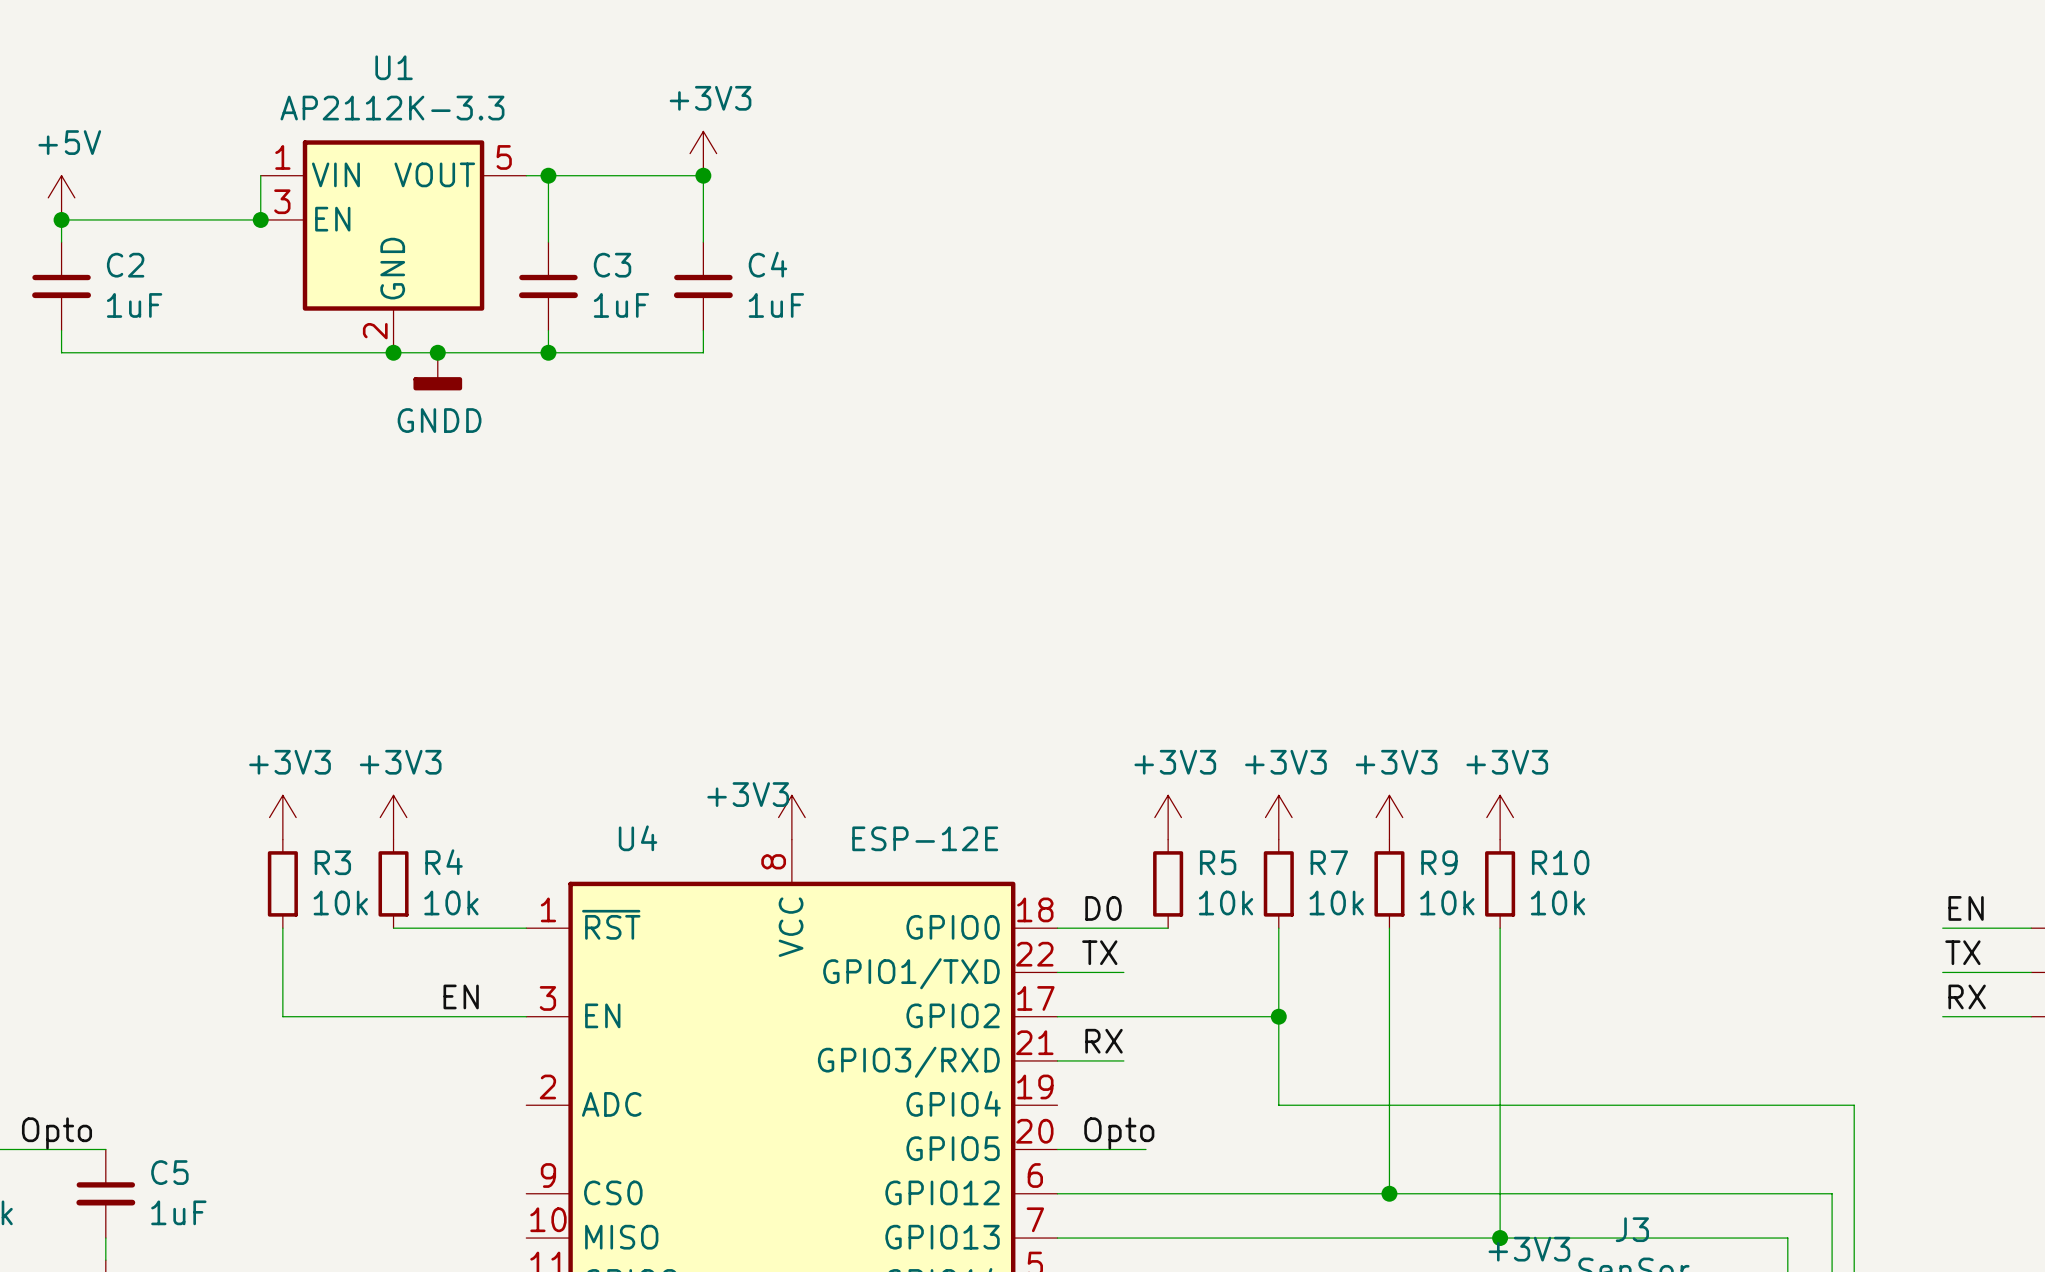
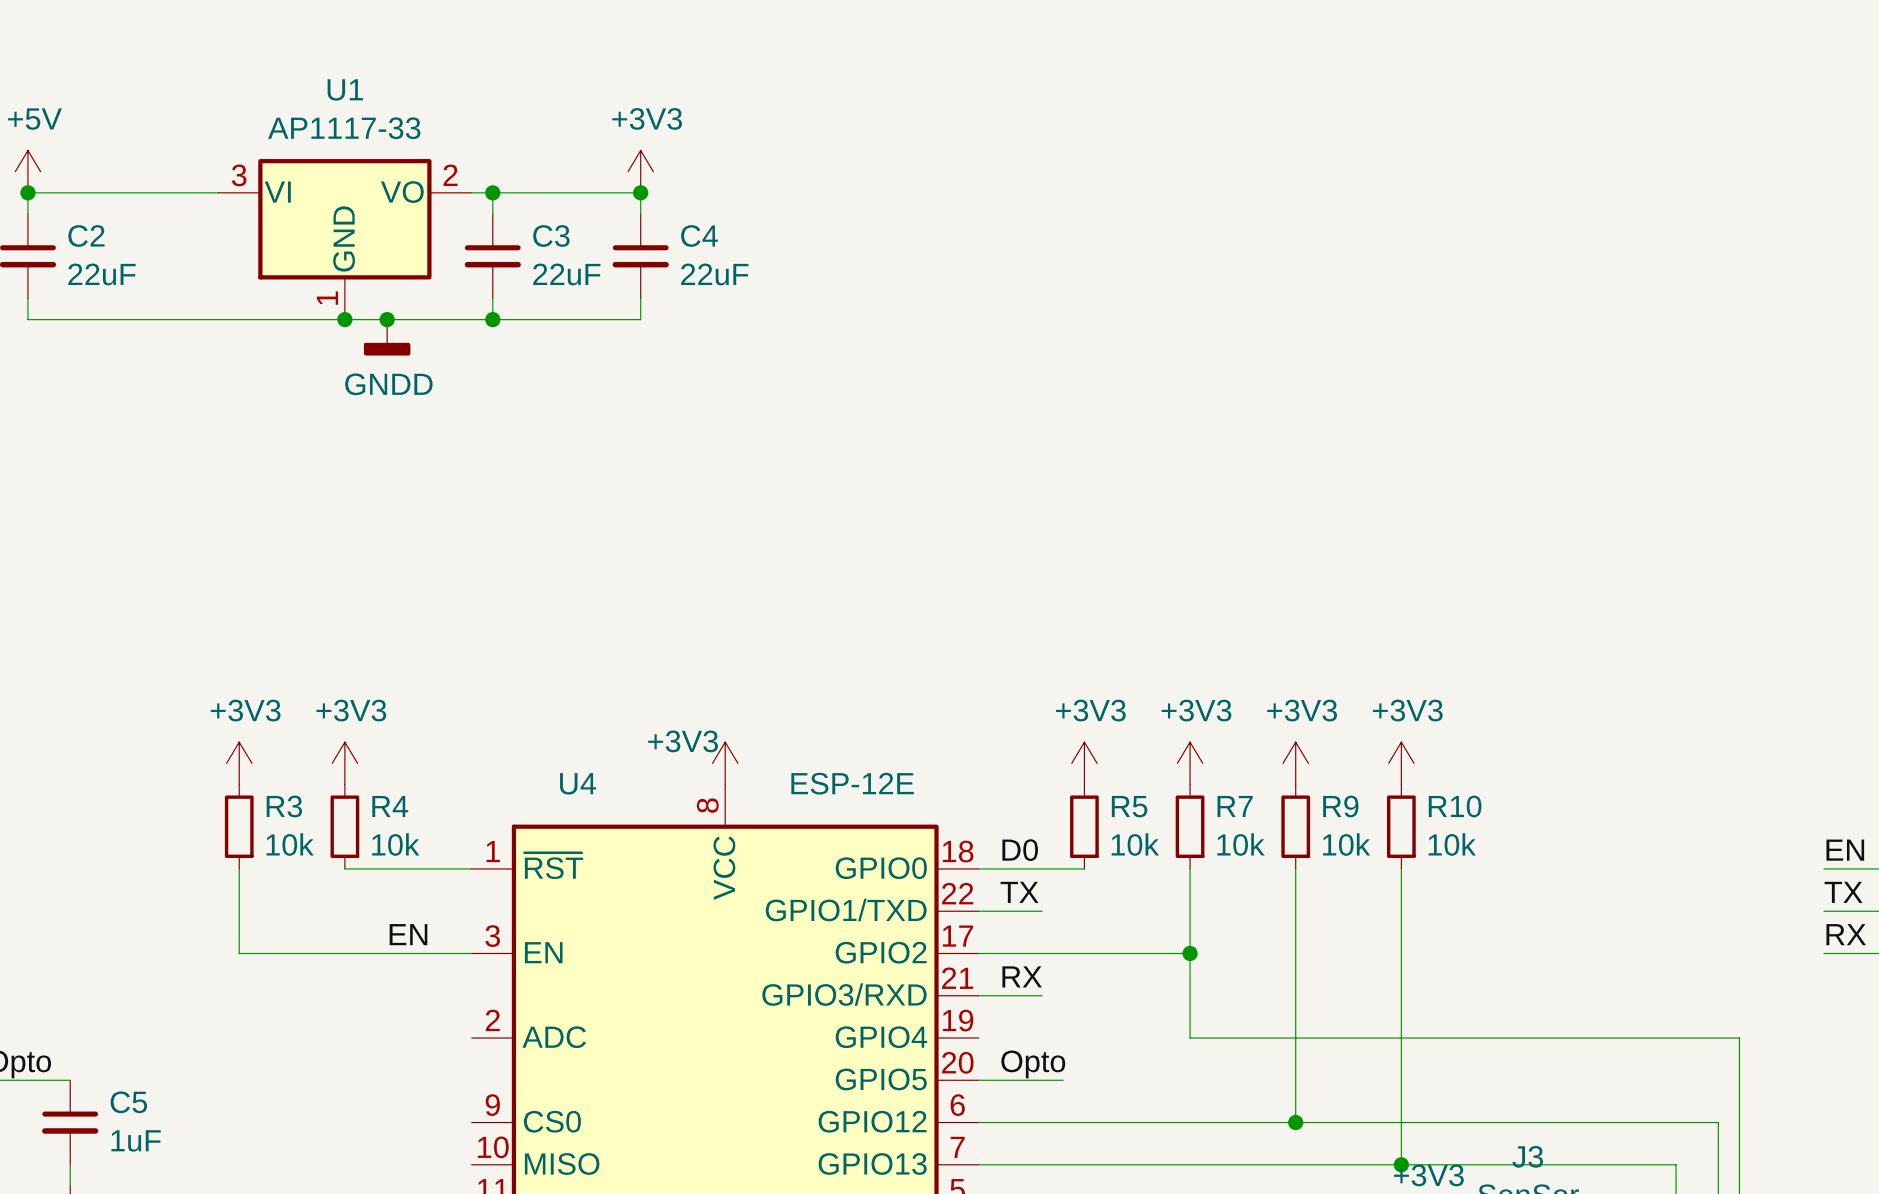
U1 value: AP2112K-3.3 (392, 108) -> AP1117-33 (344, 128)
U1 symbol: [260, 140, 527, 353] -> [218, 159, 472, 320]
power symbol position: +3V3 (703, 153) -> +3V3 (640, 171)
wire: (260, 175) (260, 219) -> none
wire: (526, 175) (703, 175) (703, 219) -> (471, 192) (640, 192)
wire: (548, 175) (548, 219) -> none
junction position: (548, 175) -> (492, 192)
junction position: (703, 175) -> (640, 192)
junction: (260, 219) -> none
C2 value: 1uF (134, 305) -> 22uF (101, 274)
C3 value: 1uF (621, 305) -> 22uF (566, 274)
C4 value: 1uF (776, 305) -> 22uF (714, 274)

